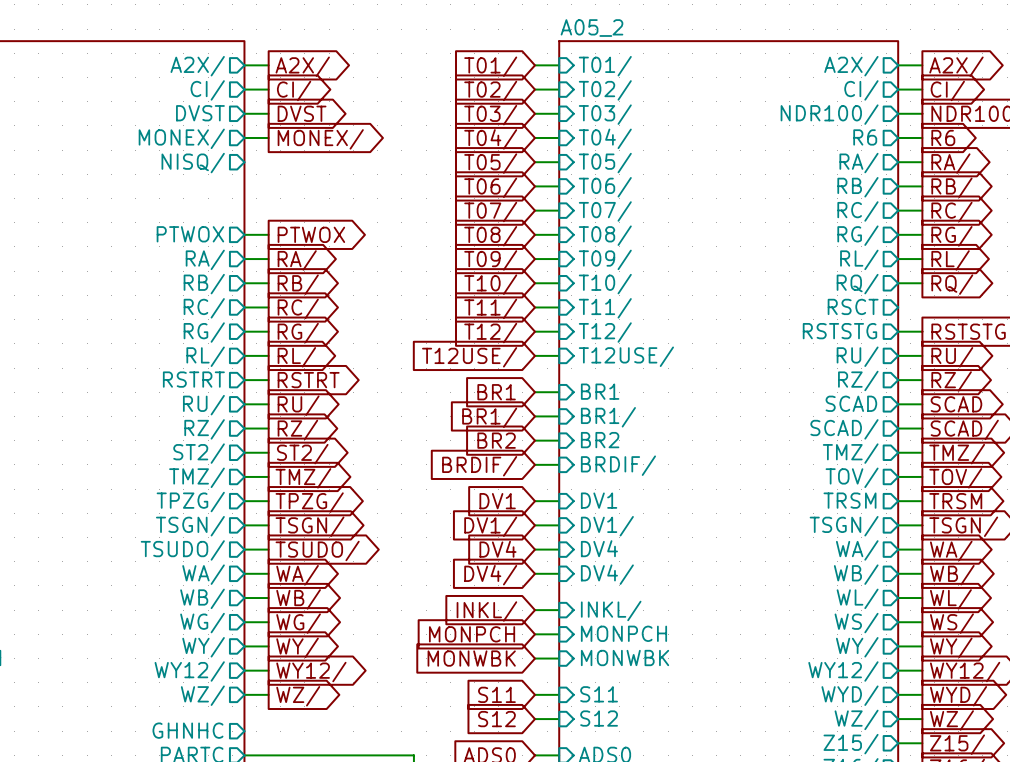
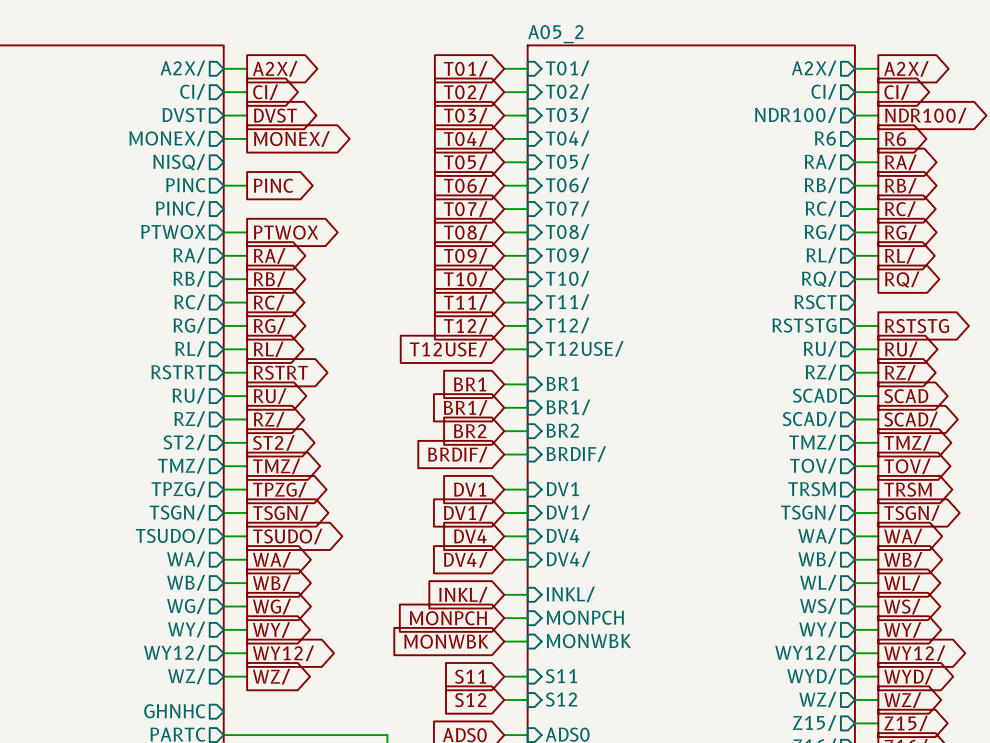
sheet pin: none -> PINC (185, 185)
wire: none -> (223, 185) (247, 185)
global label: none -> PINC (273, 185)
sheet pin: none -> PINC/ (180, 208)

